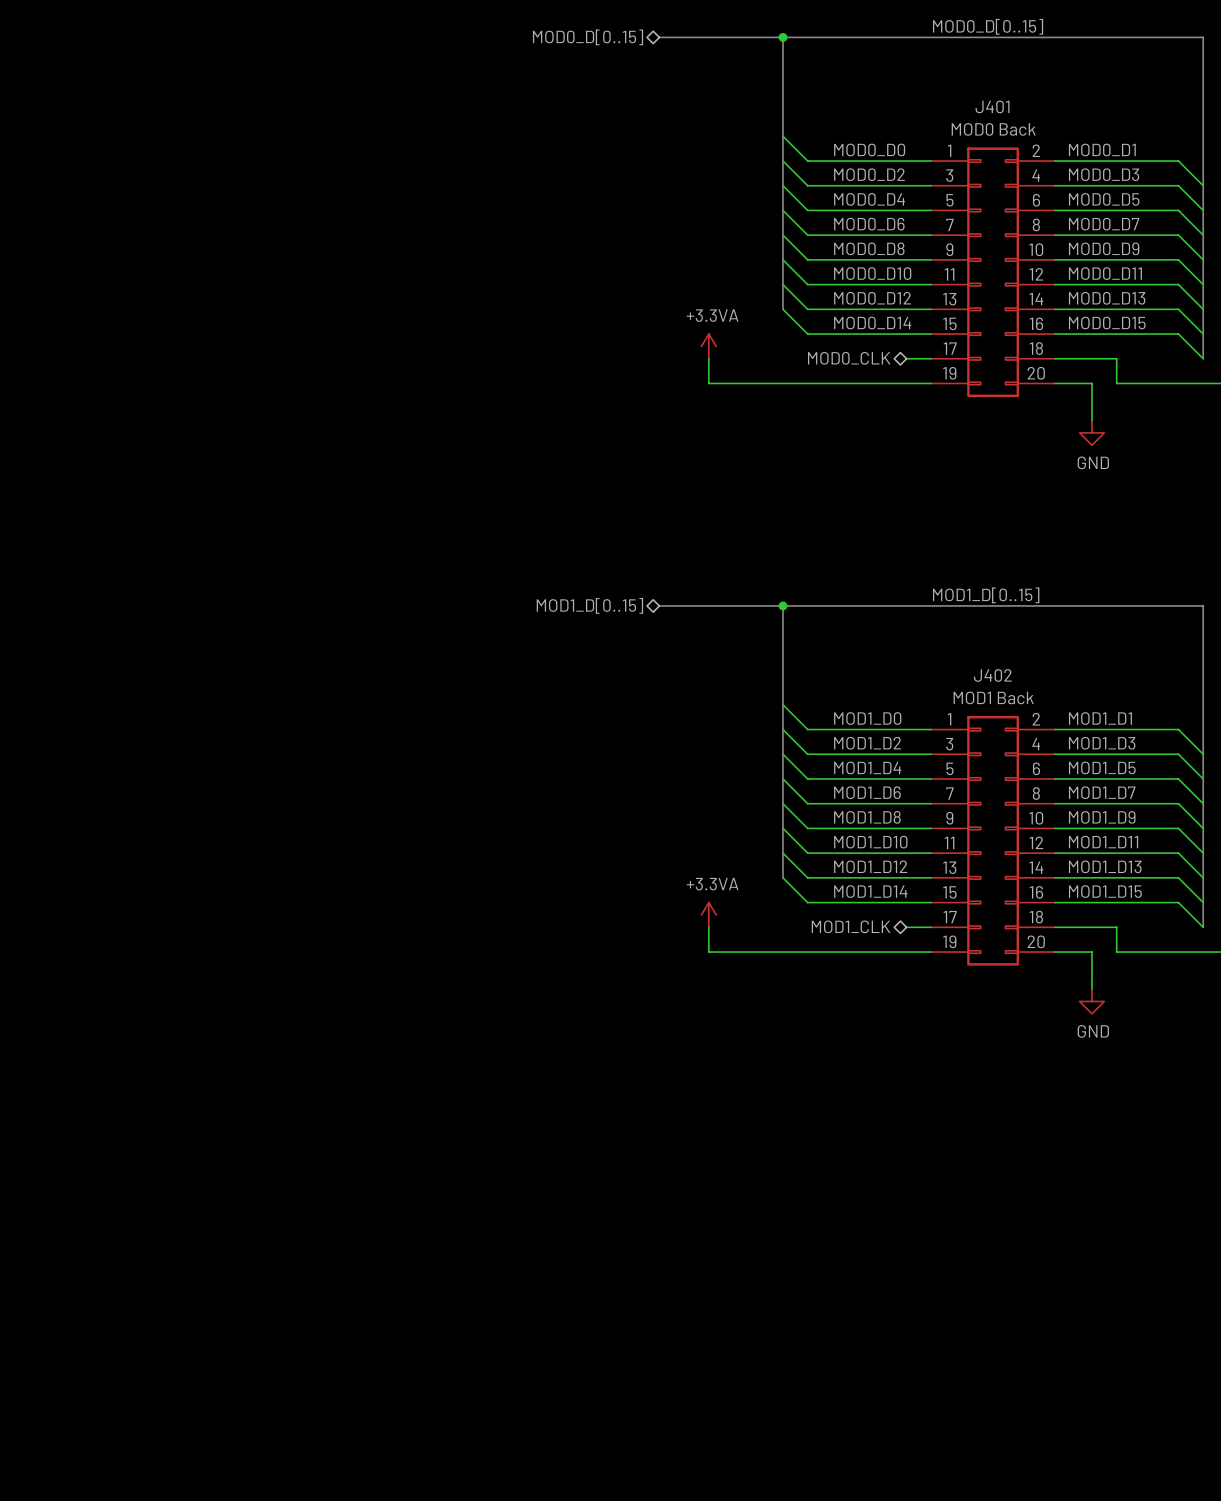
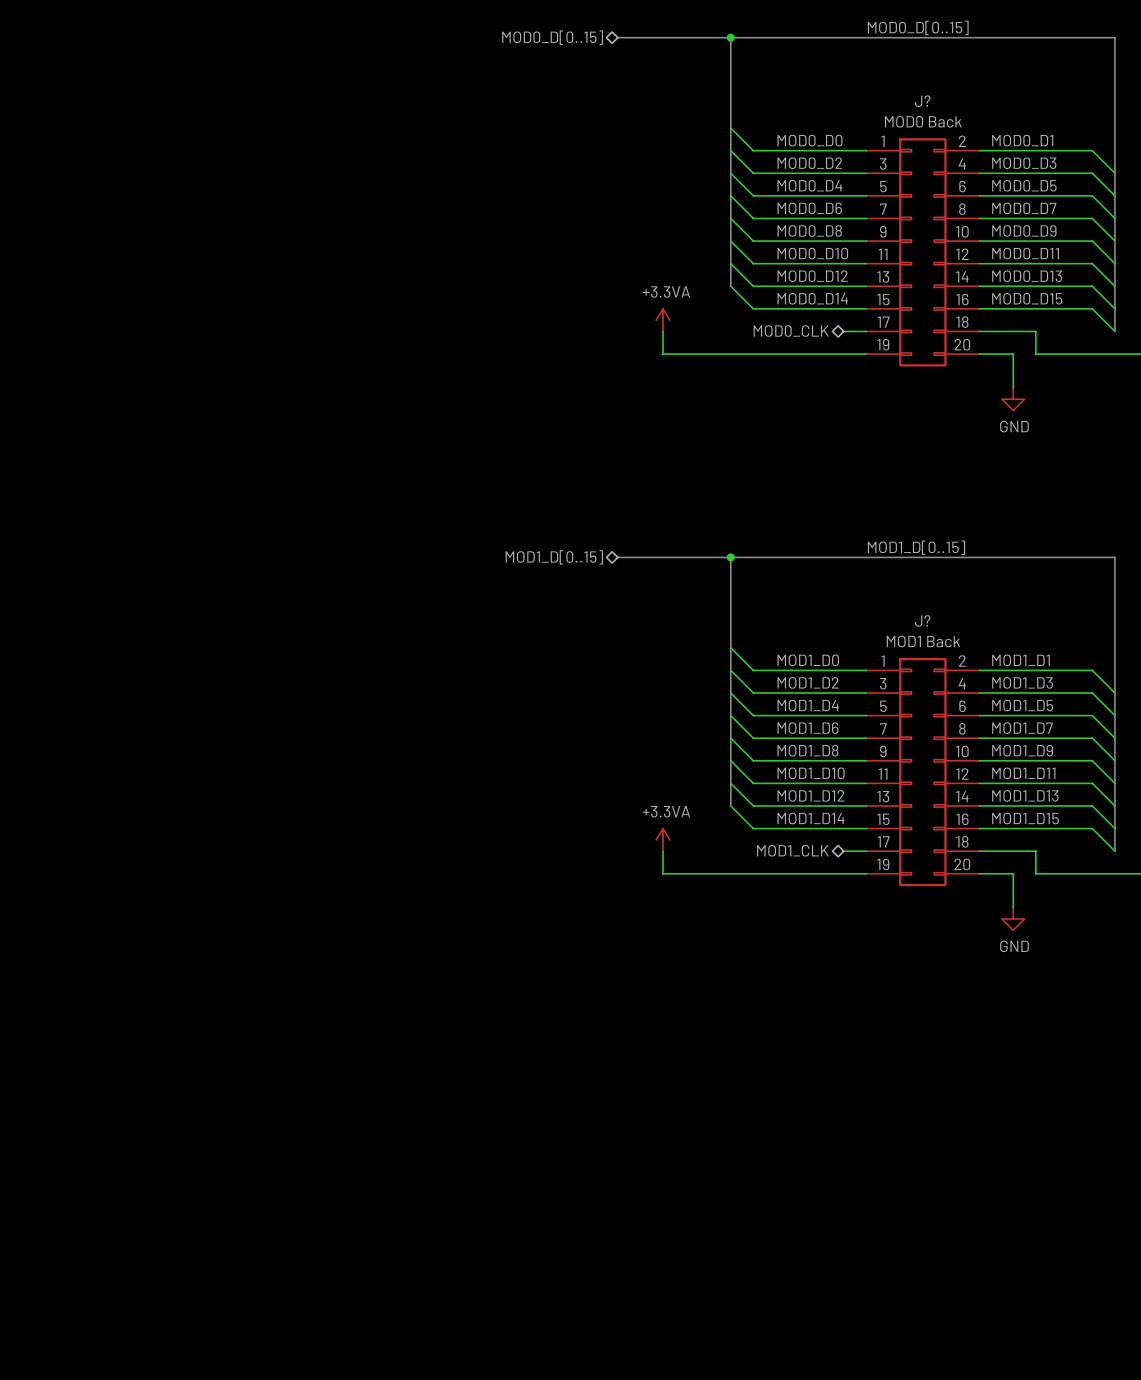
J401 name: J401 (992, 106) -> J? (922, 101)
J402 name: J402 (992, 675) -> J? (922, 620)

